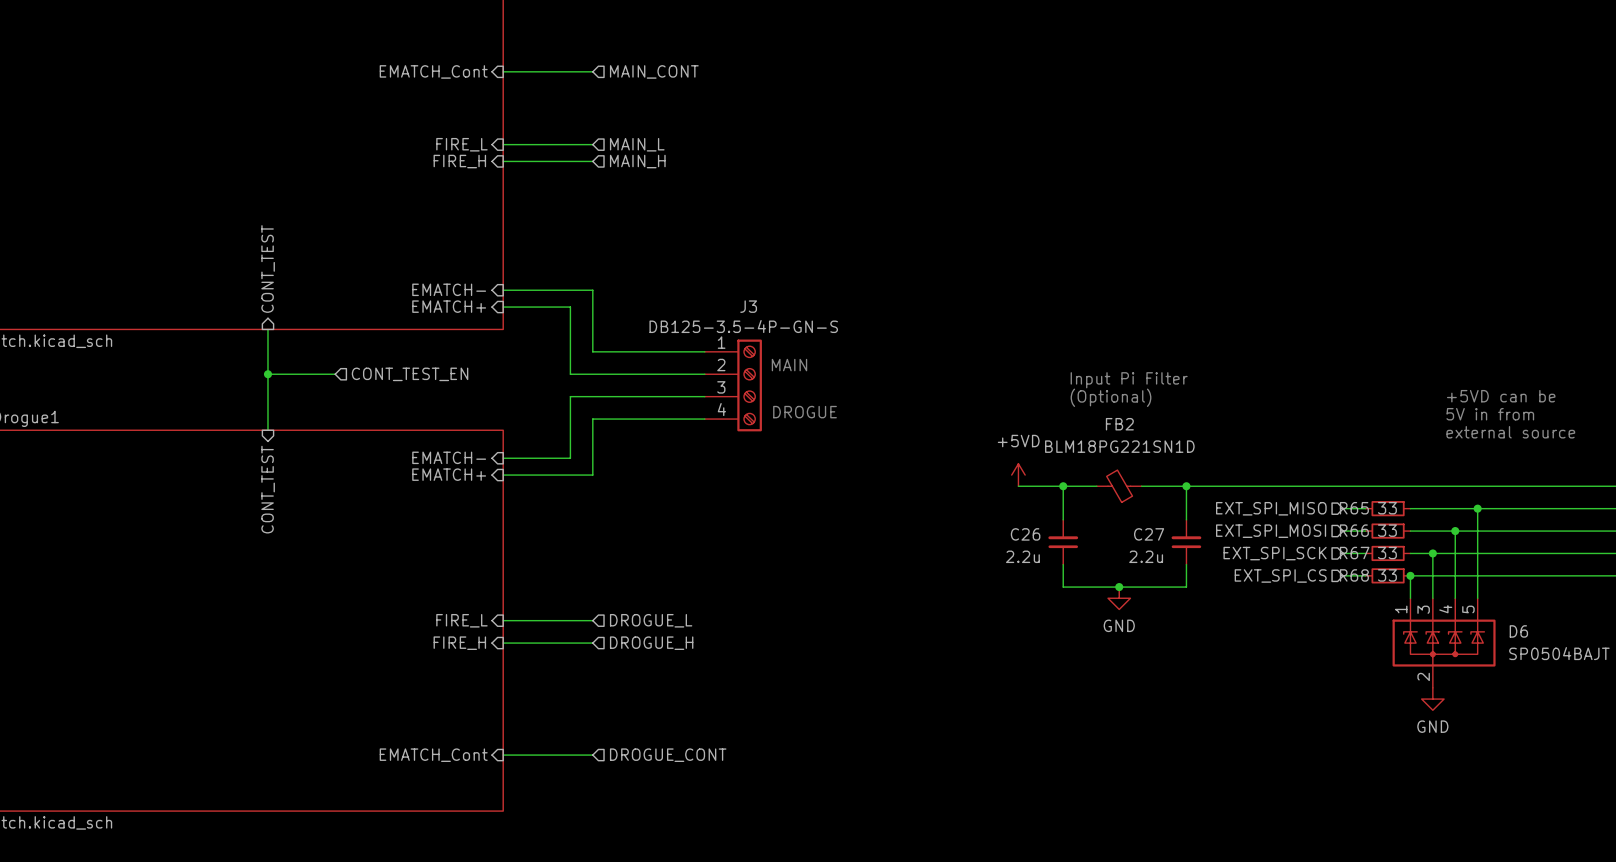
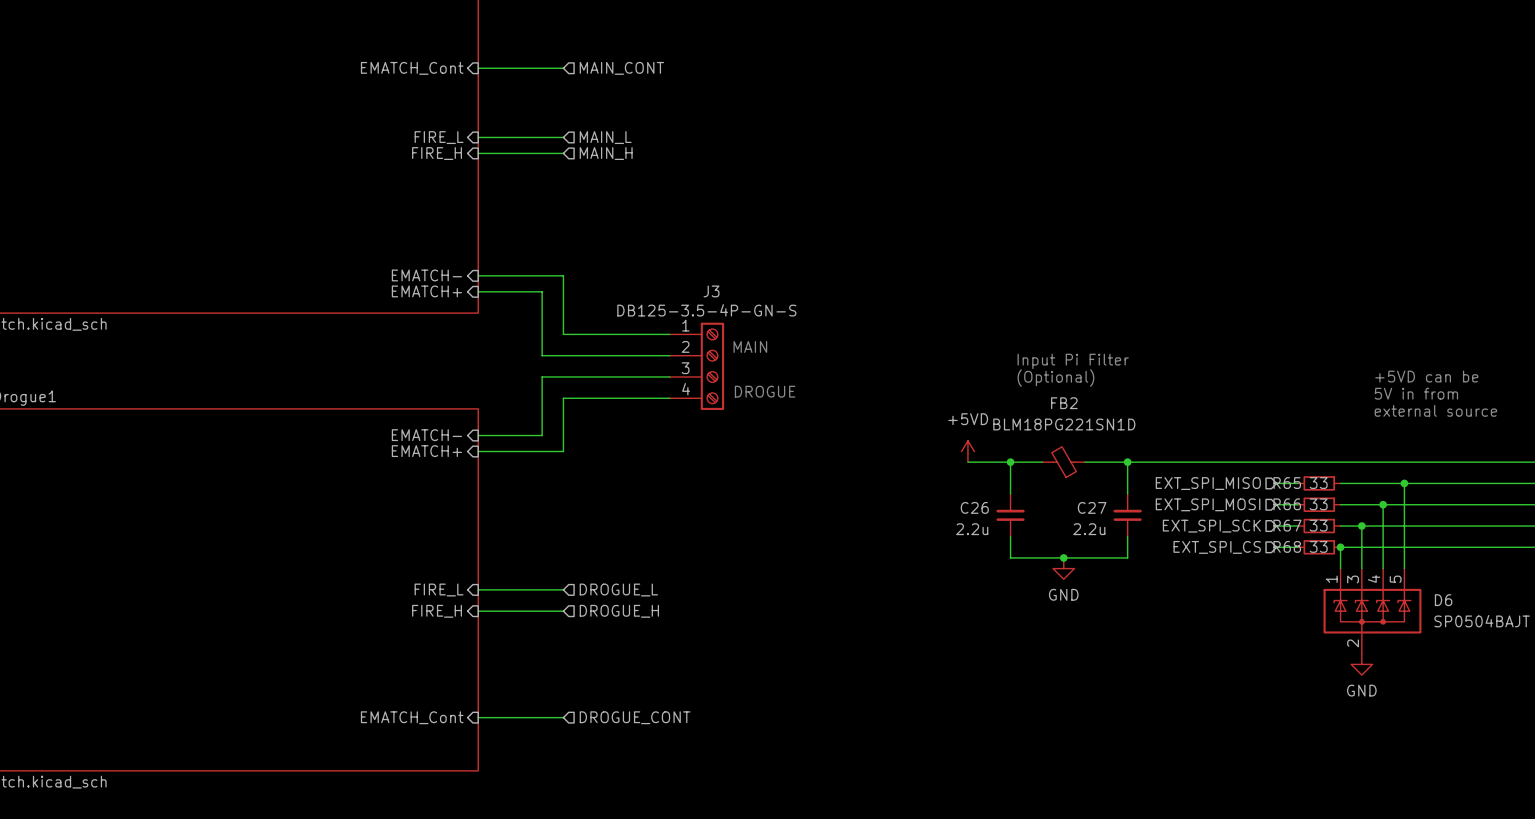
sheet pin: CONT_TEST (268, 268) -> none
wire: (267, 329) (267, 430) -> none
wire: (267, 374) (335, 374) -> none
junction: (267, 374) -> none
hierarchical label: CONT_TEST_EN (410, 374) -> none
sheet pin: CONT_TEST (268, 489) -> none

